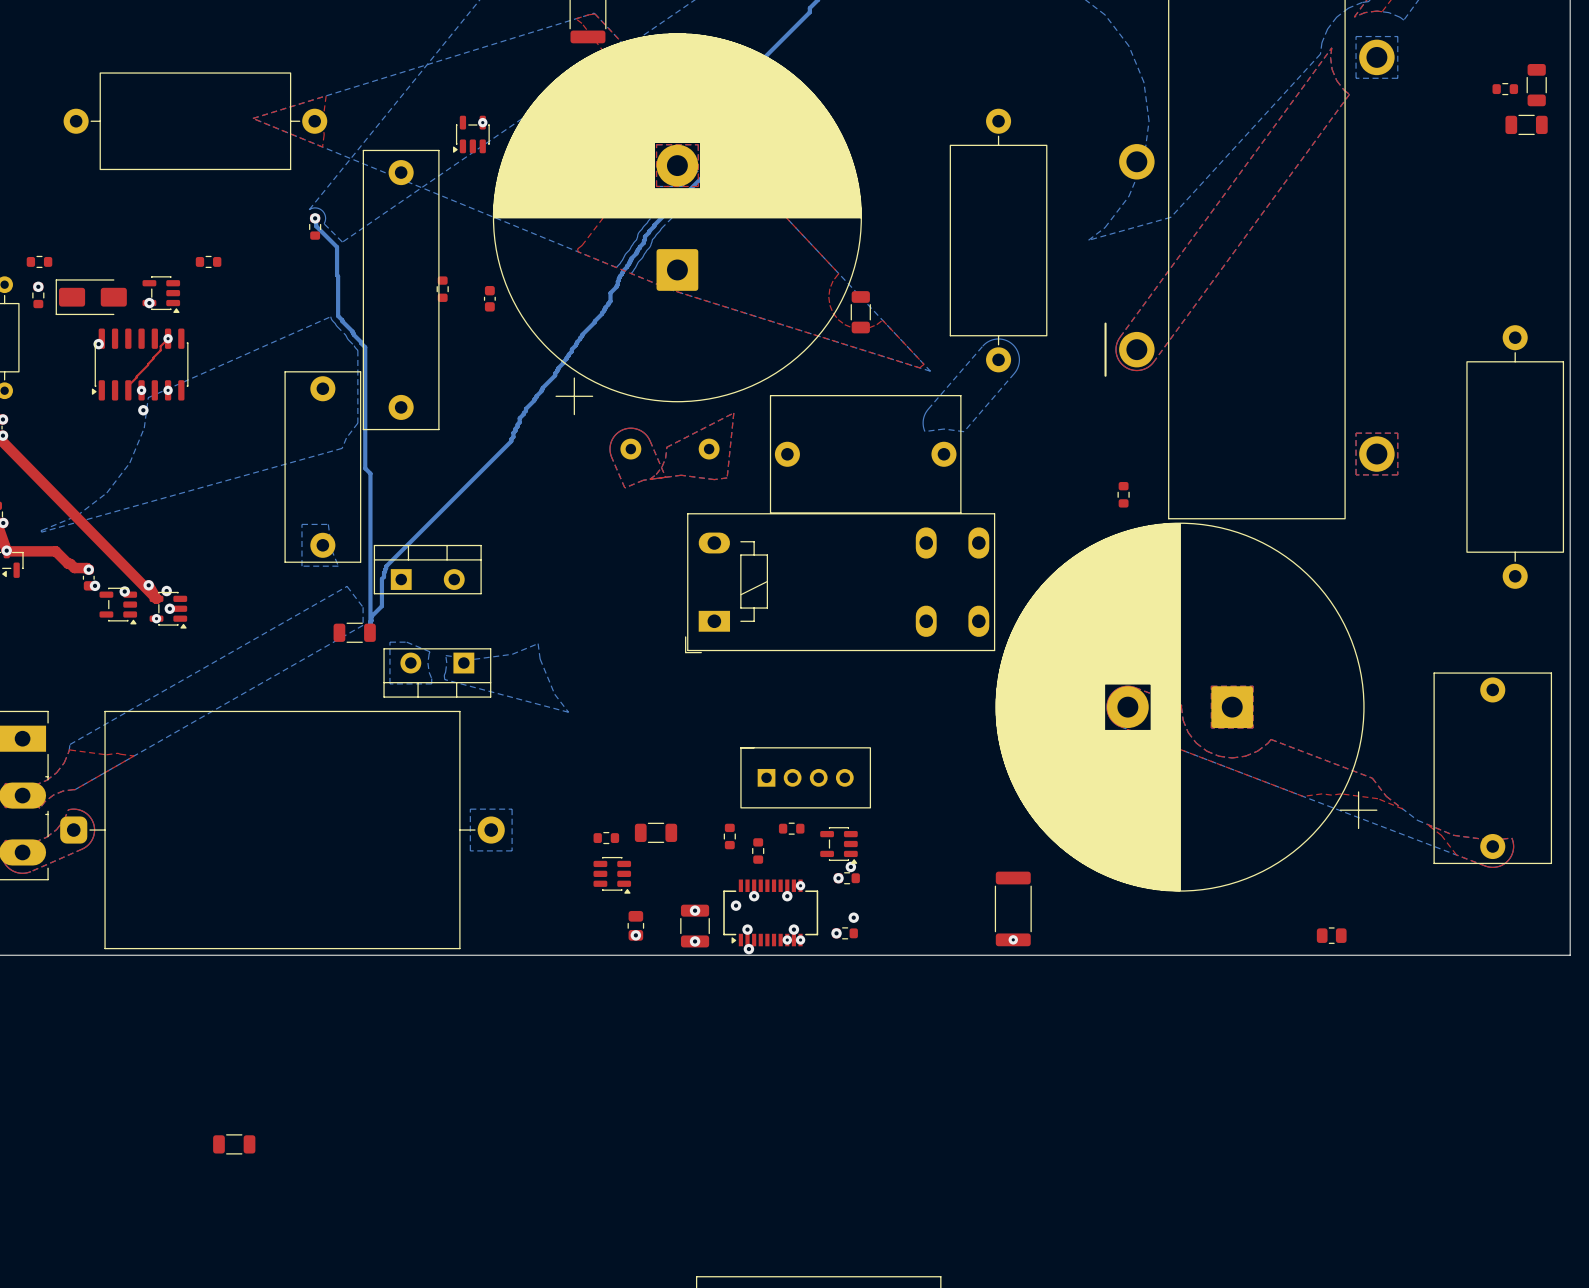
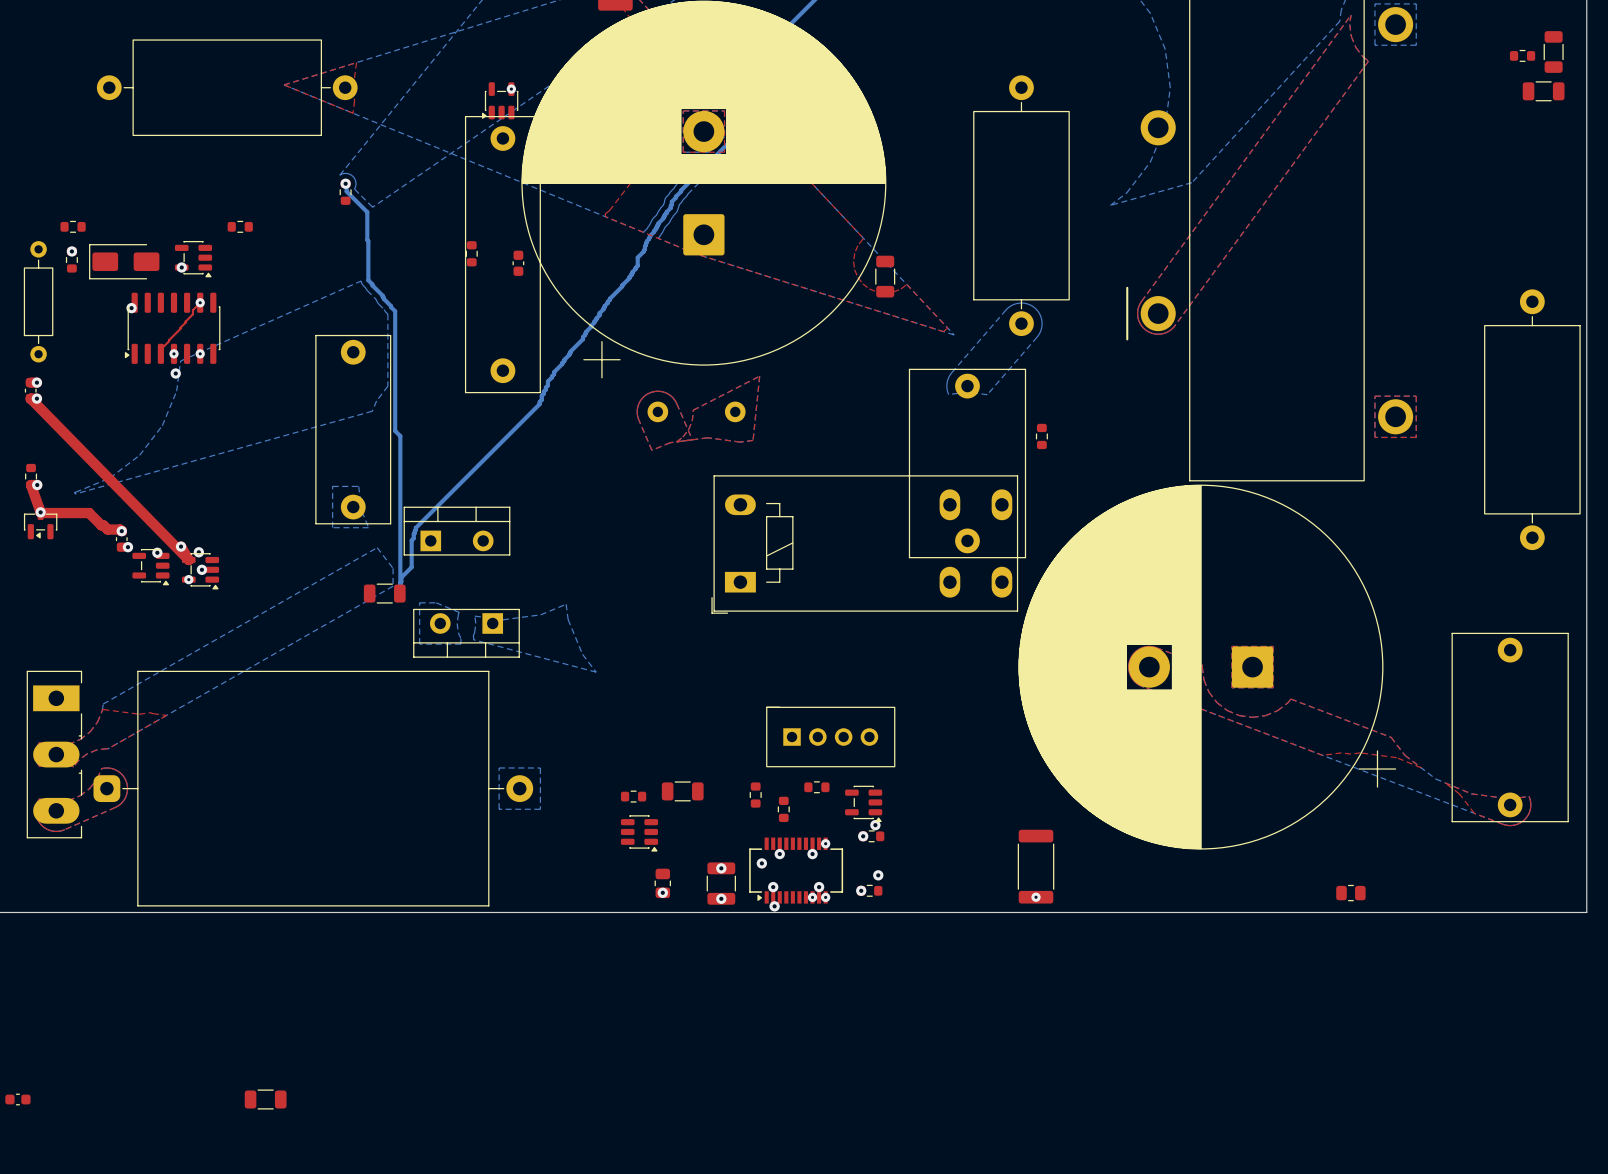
part position: (401, 290) -> (502, 254)
part rotation: 0° (865, 454) -> 90° clockwise (967, 463)
part position: (1123, 494) -> (1041, 436)

